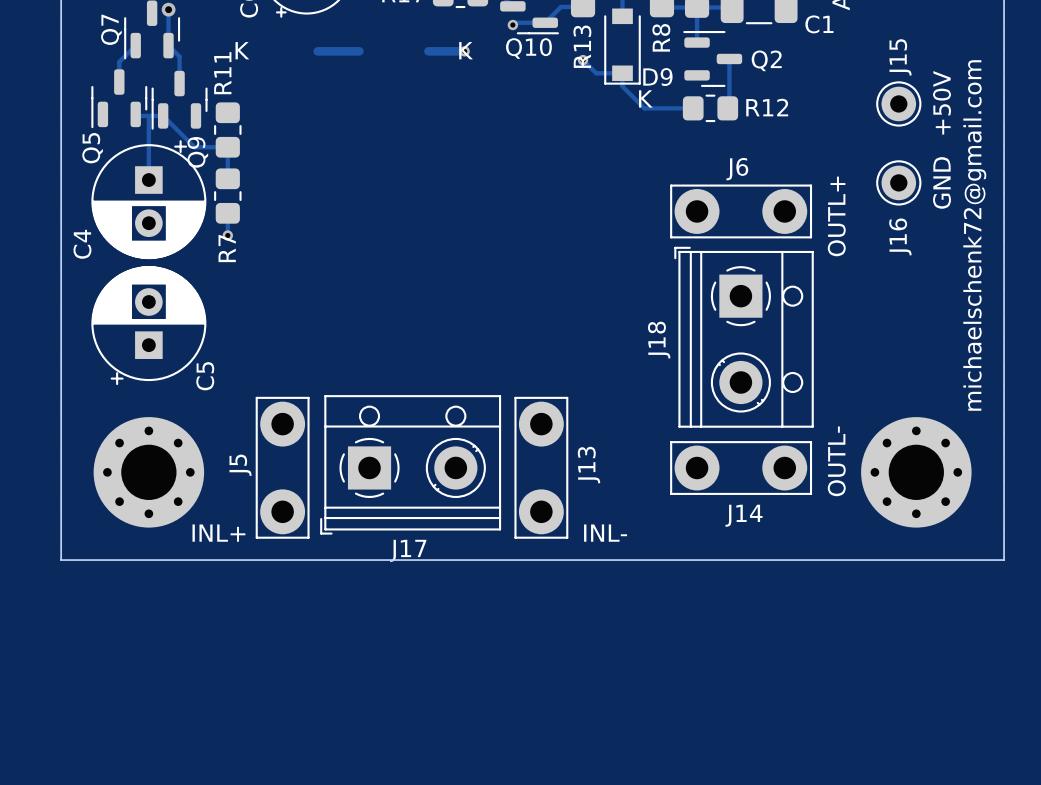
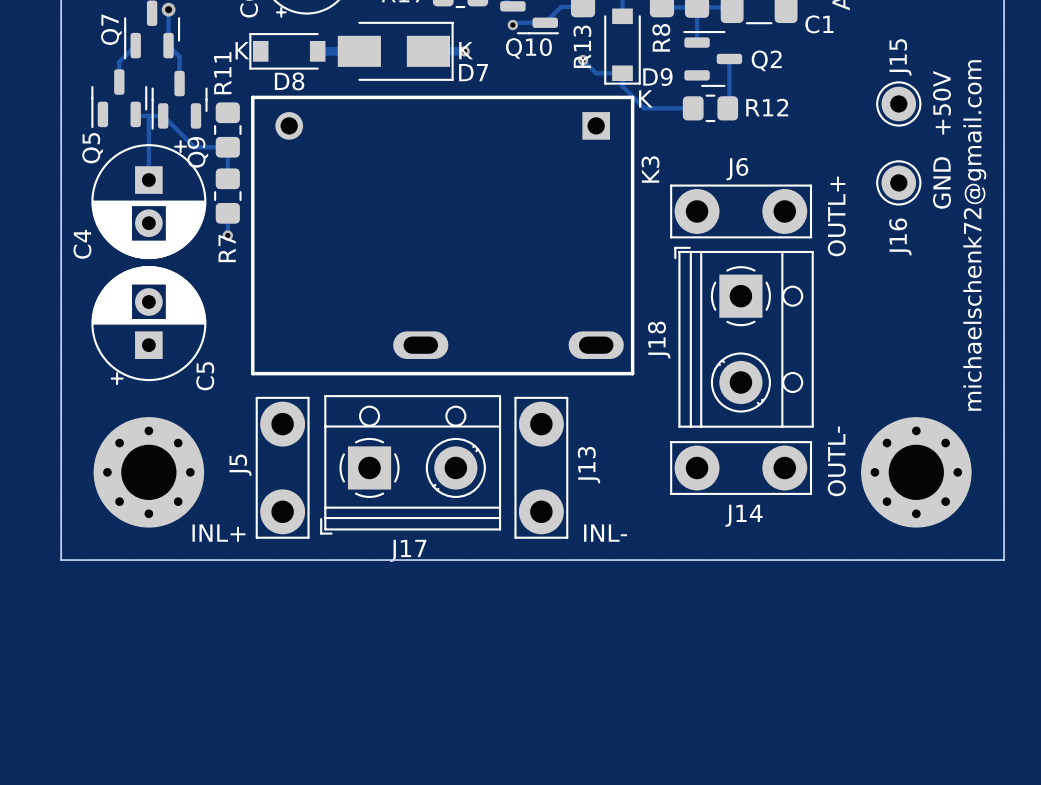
D8: none -> (287, 51)
D7: none -> (395, 51)
K3: none -> (442, 235)

